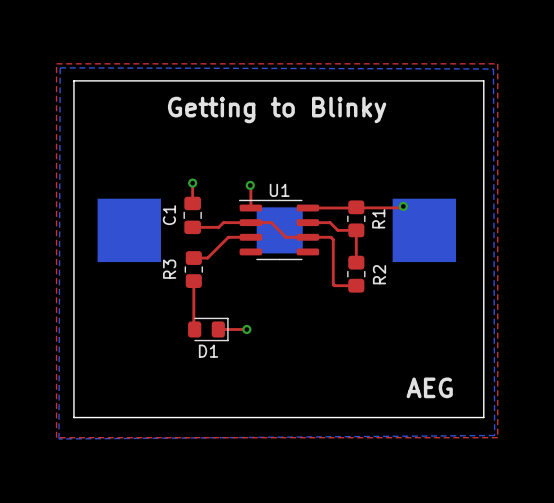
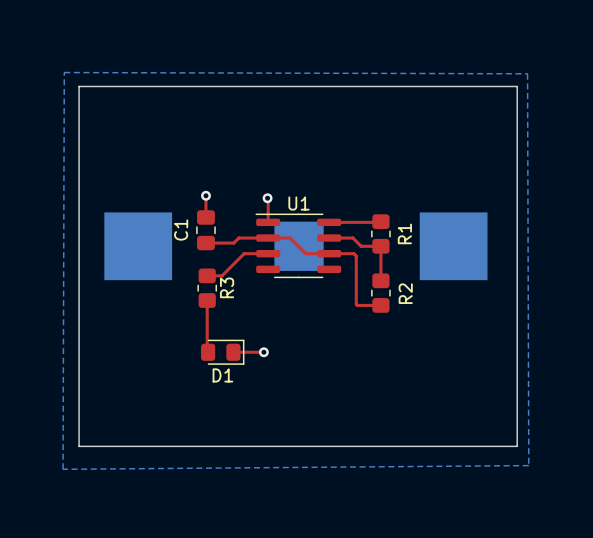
top zone outline: (56, 63) (56, 437) (497, 437) (497, 63) (56, 63) -> none
text: Getting to Blinky (277, 109) -> none
top track: (403, 206) (356, 207) -> none
via: (403, 206) -> none
R3 name position: R3 (169, 269) -> R3 (227, 287)
text: AEG (429, 387) -> none

